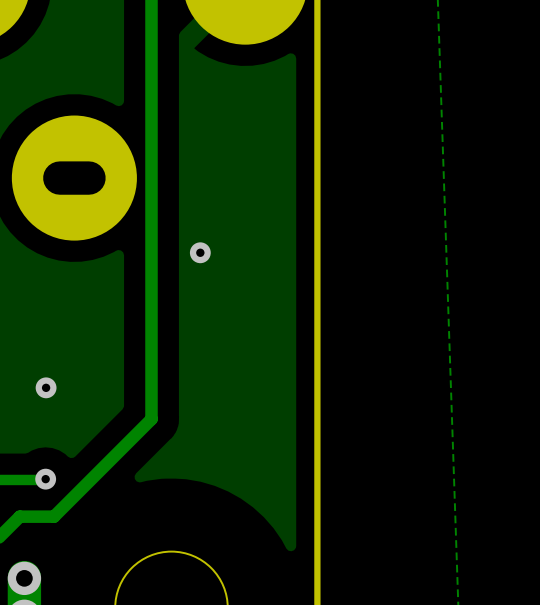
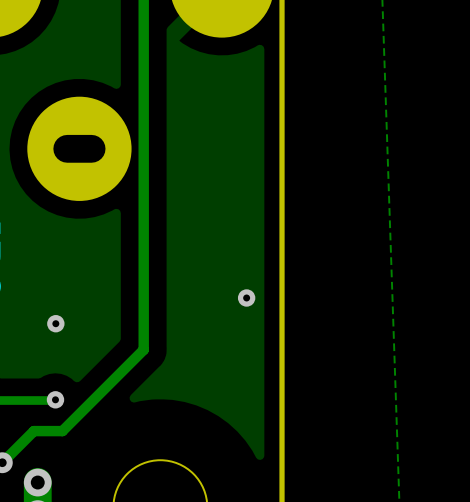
via position: (200, 252) -> (246, 297)

